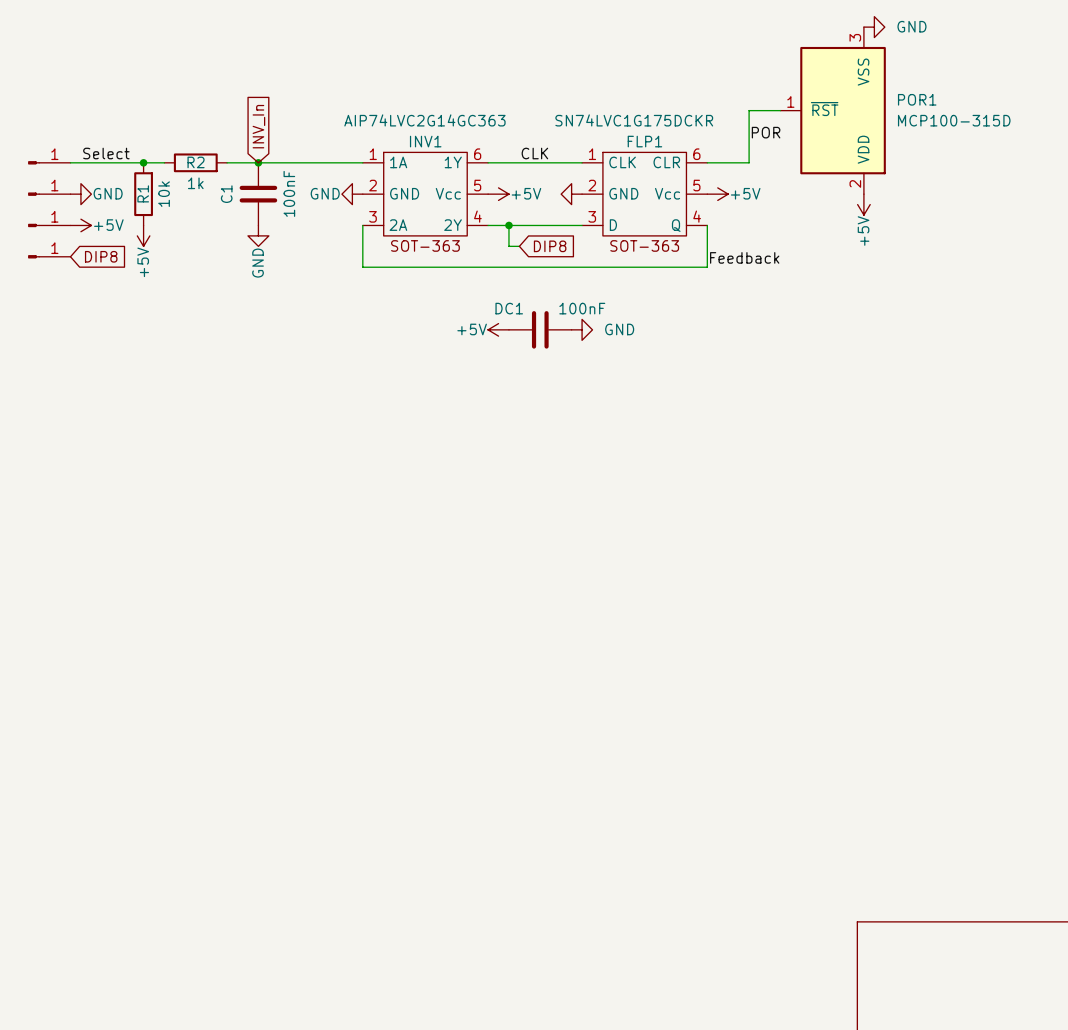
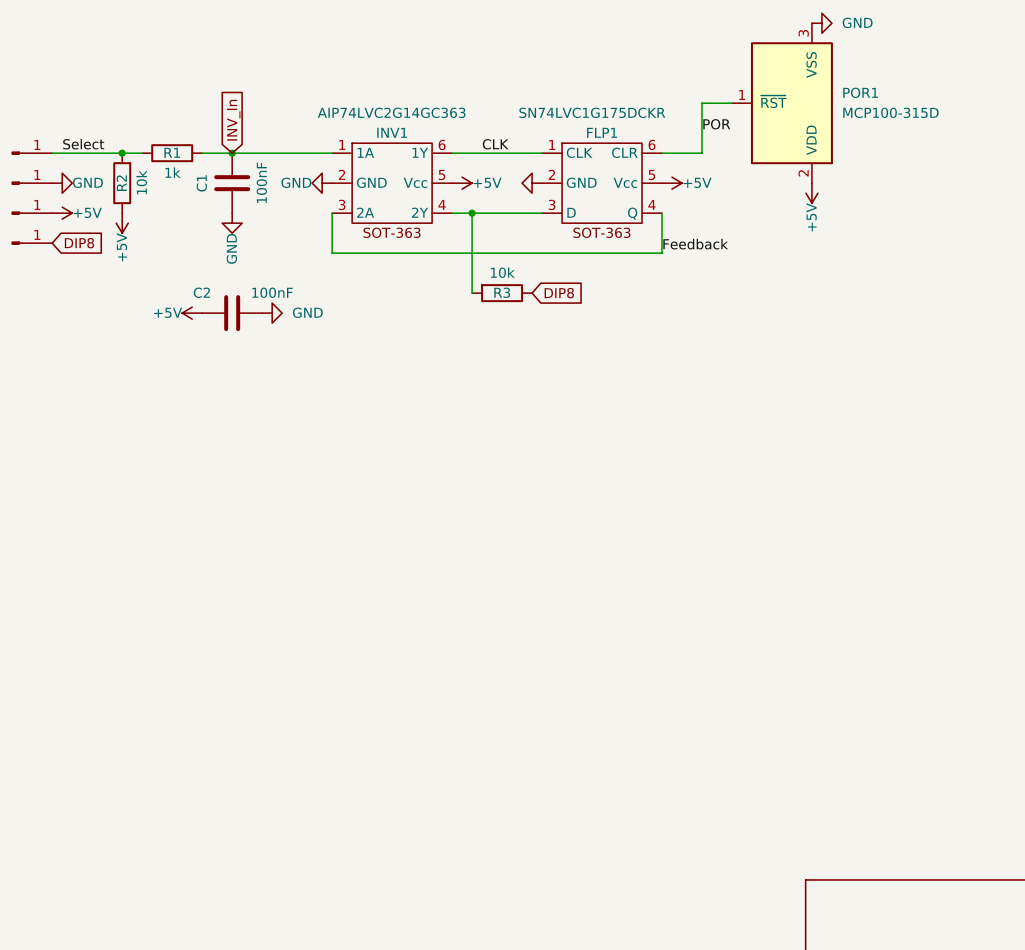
R2 name: R2 (196, 162) -> R1 (172, 152)
R1 name: R1 (143, 193) -> R2 (121, 183)
wire: (508, 246) (519, 246) -> (472, 233) (472, 293)
global label position: DIP8 (550, 246) -> DIP8 (559, 293)
R3: none -> 10k (502, 293)
power symbol: none -> +5V (192, 313)
C2: none -> 100nF (232, 313)
power symbol: none -> GND (272, 313)
power symbol: +5V (498, 329) -> none
DC1: 100nF (540, 329) -> none
power symbol: GND (582, 329) -> none

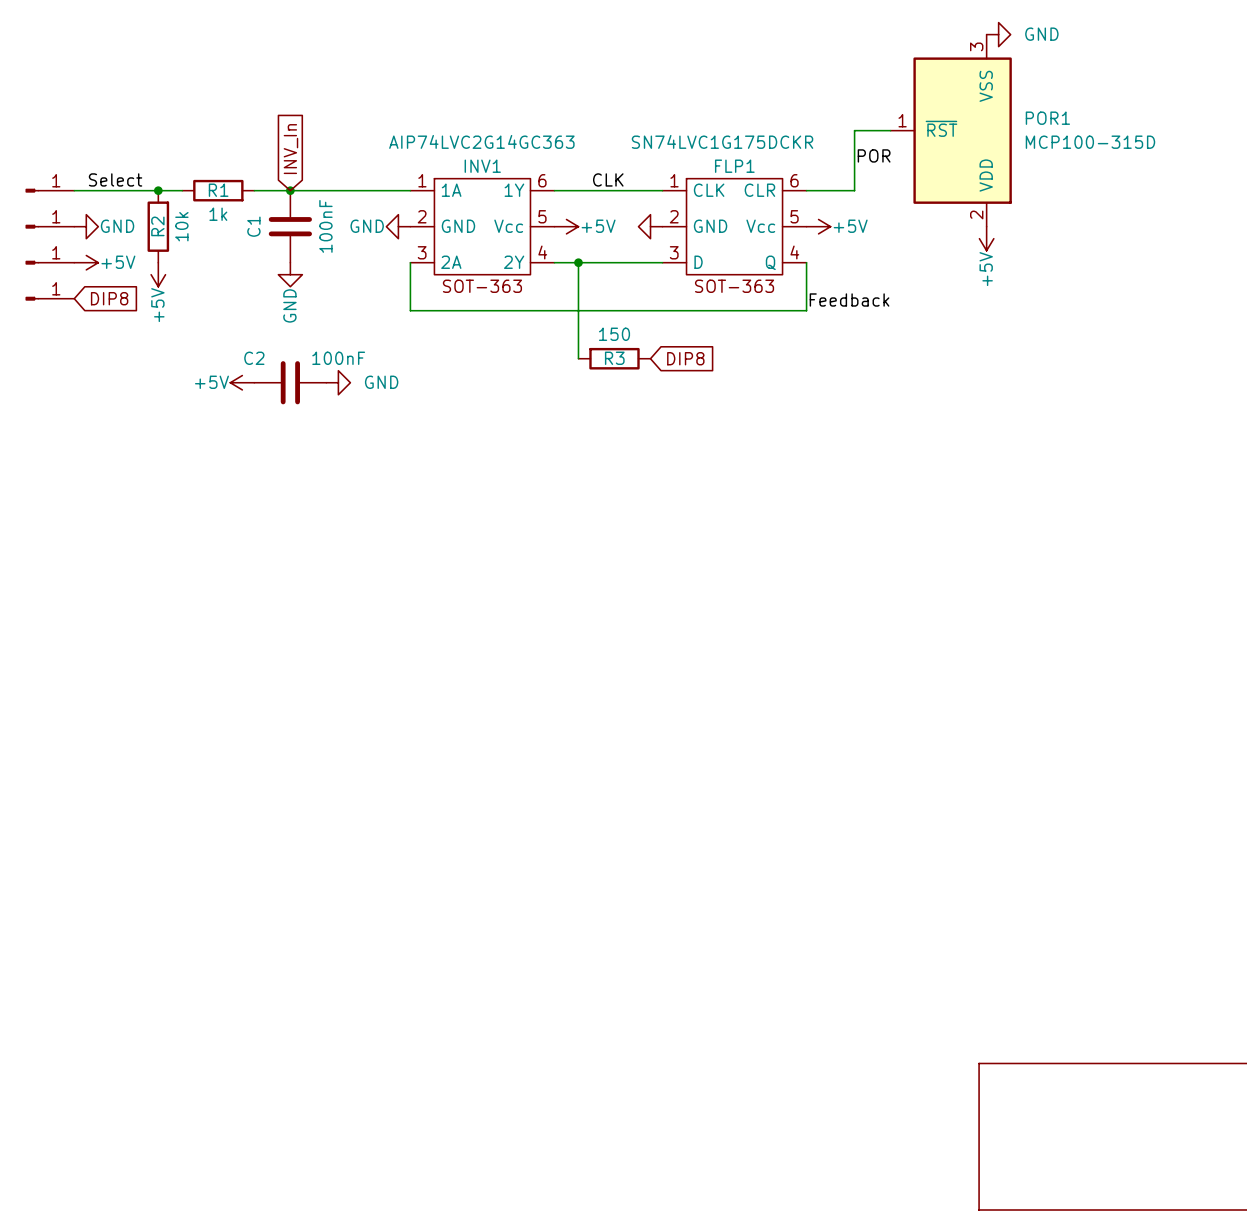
R3 value: 10k (502, 272) -> 150 (614, 334)

